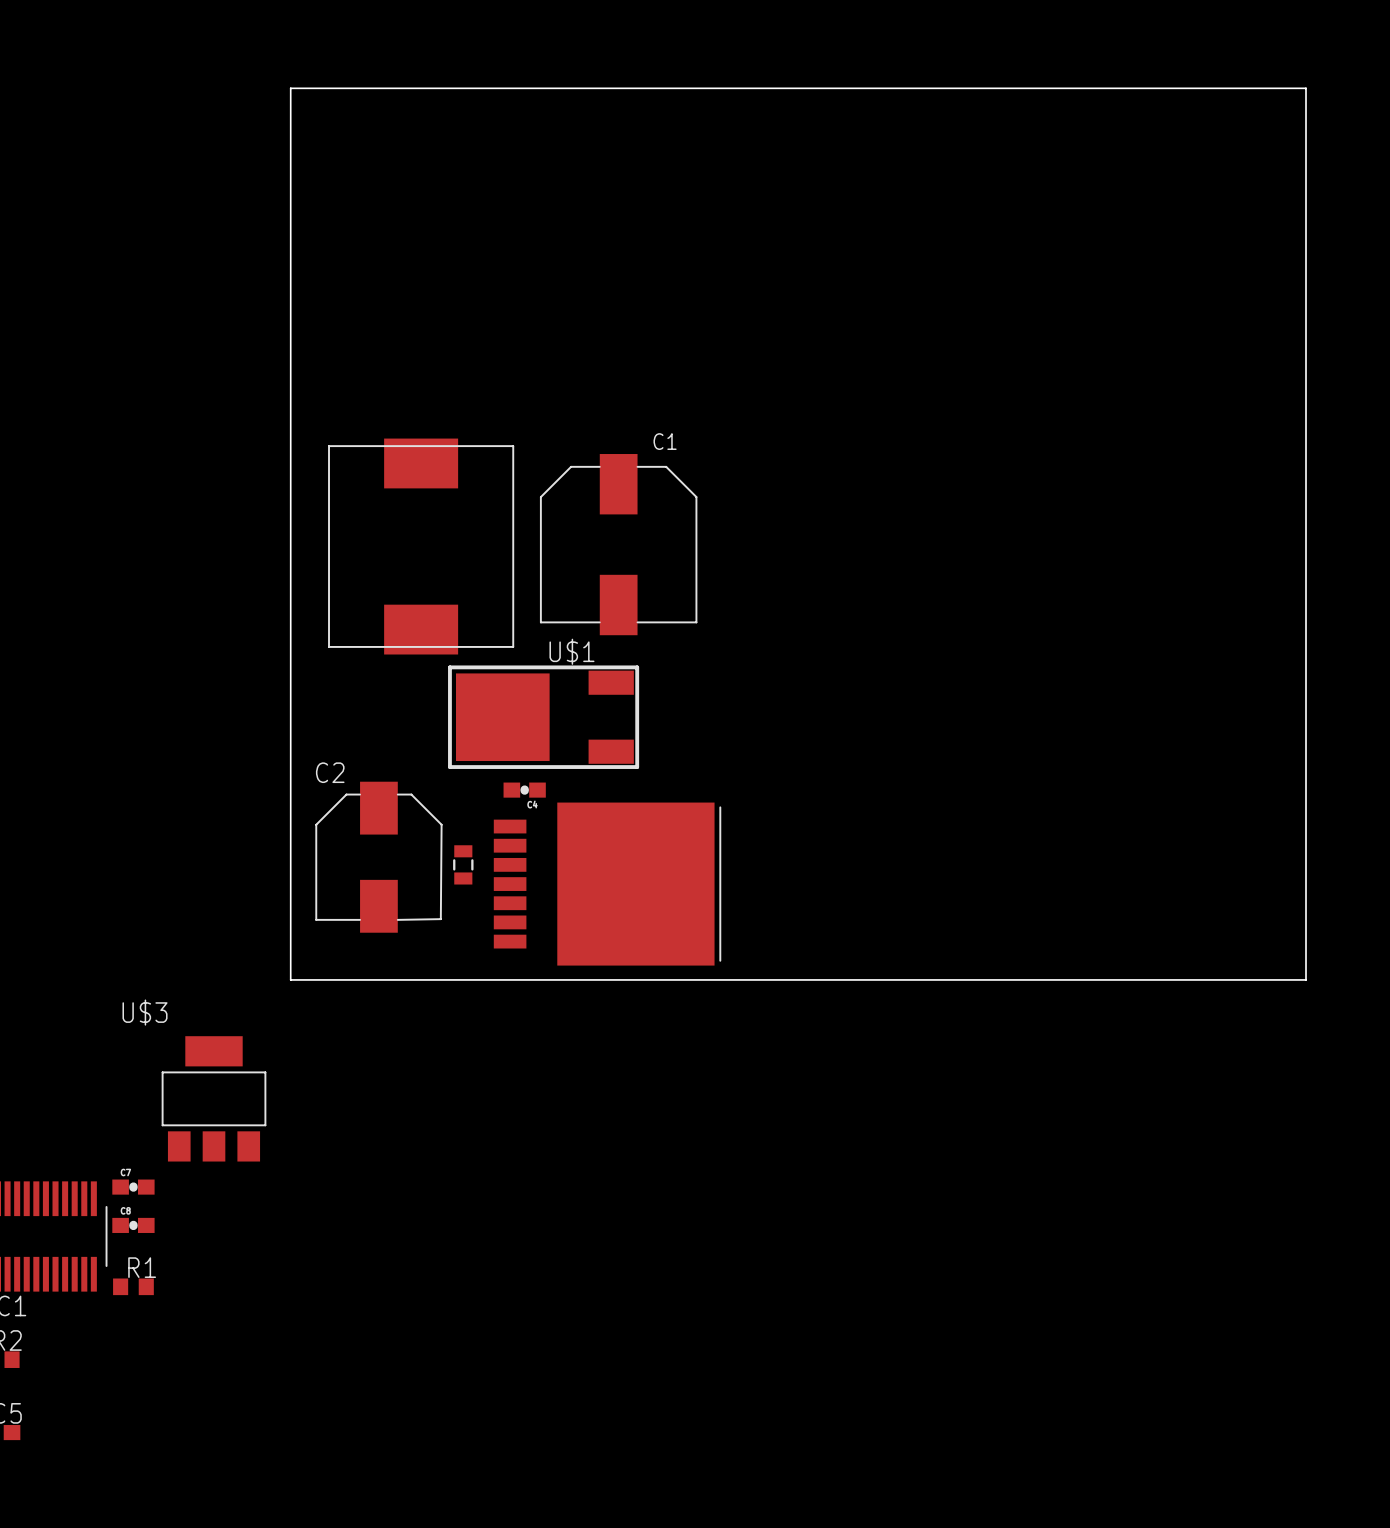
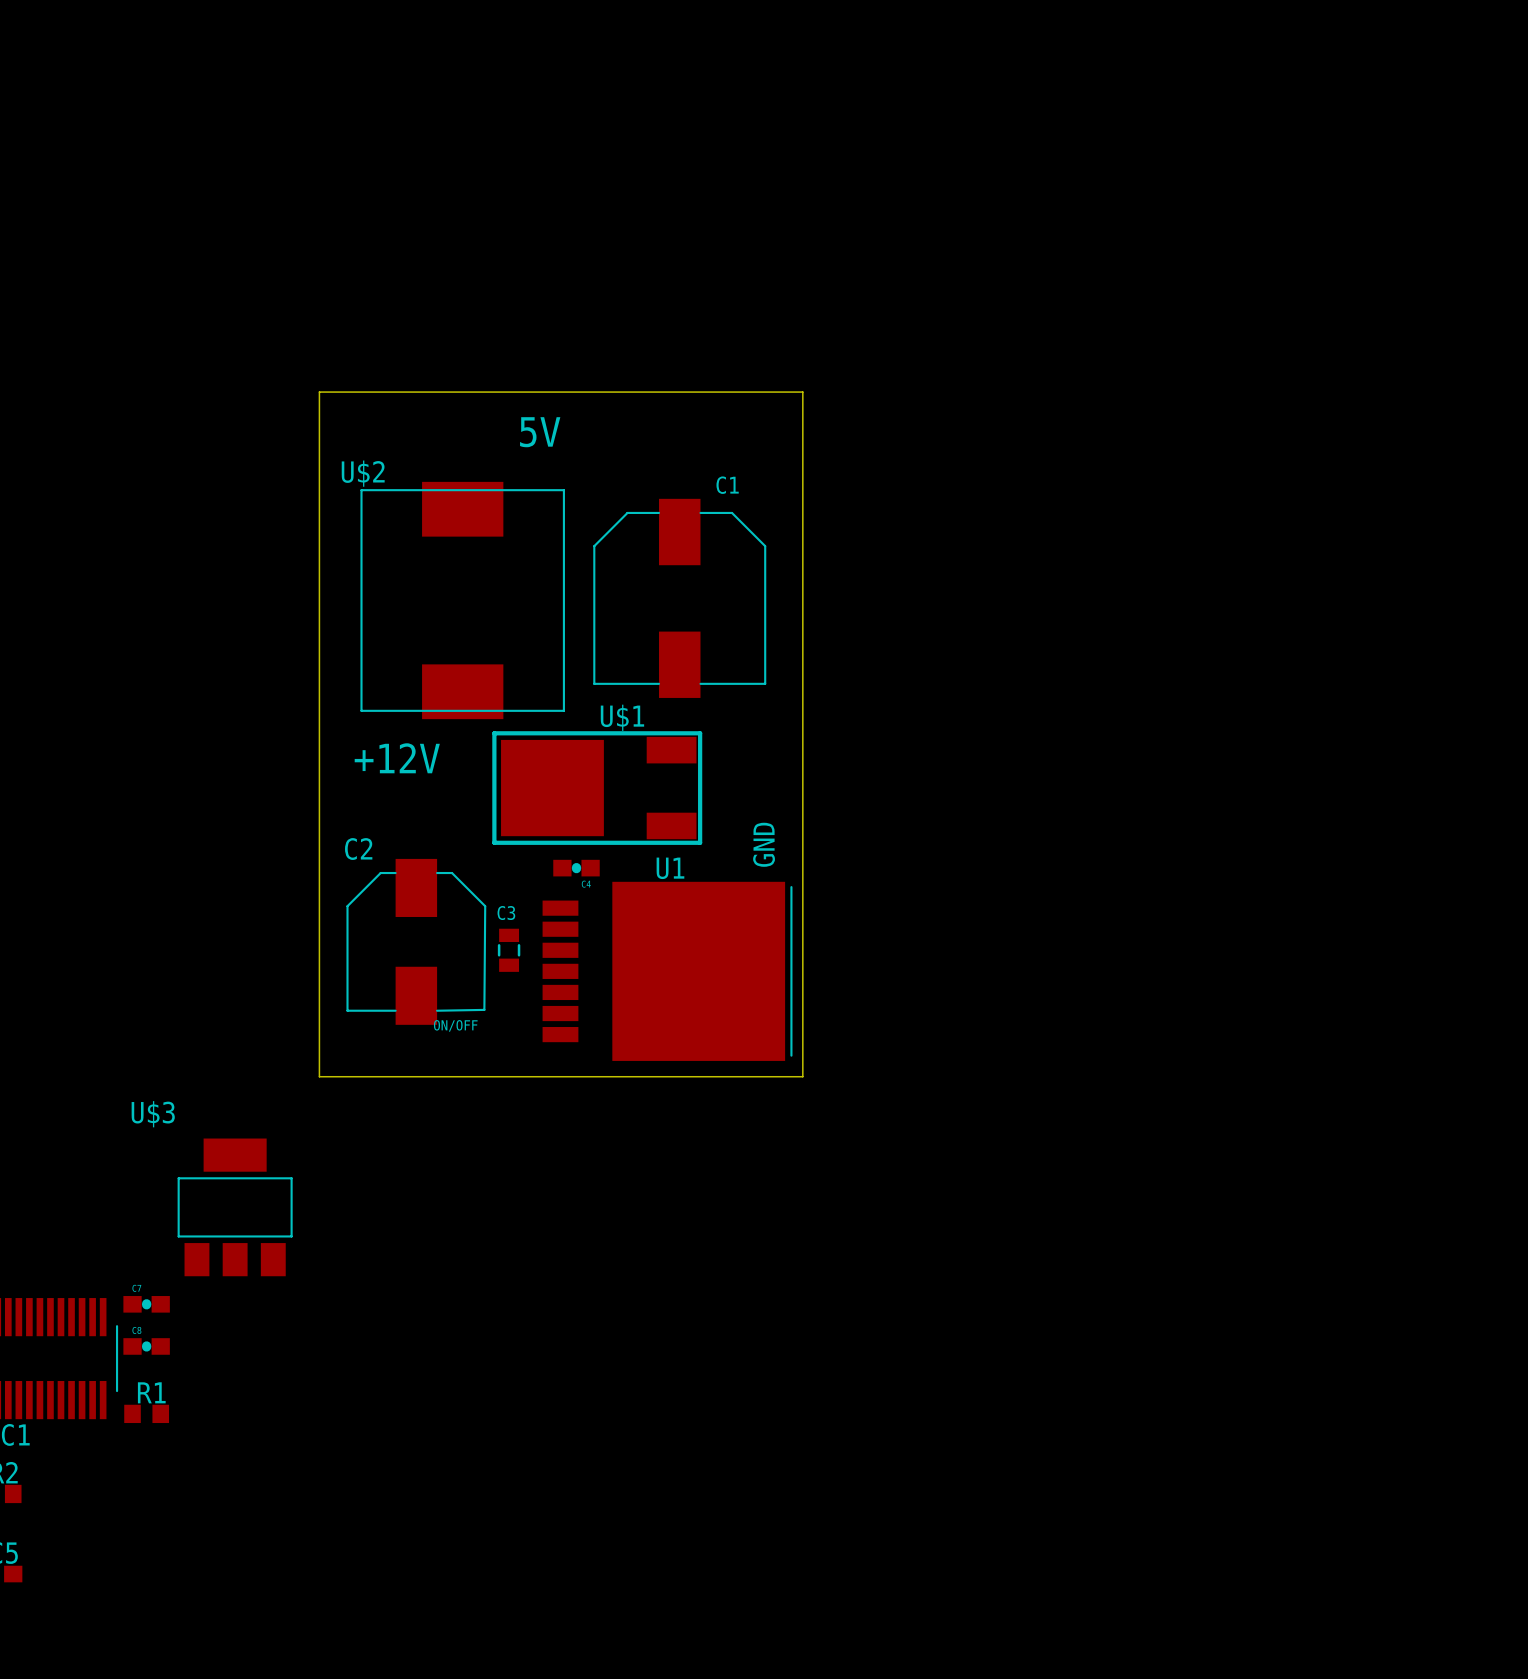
board edge: (290, 356) (290, 88) (1306, 88) (1306, 979) (730, 979) -> (319, 392) (802, 392) (802, 1076)
text: none -> 5V (540, 432)
U$2 name: none -> U$2 (363, 473)
text: none -> +12V (397, 758)
text: none -> GND (764, 844)
U1 name: none -> U1 (670, 868)
C3 name: none -> C3 (506, 913)
text: none -> ON/OFF (455, 1025)

